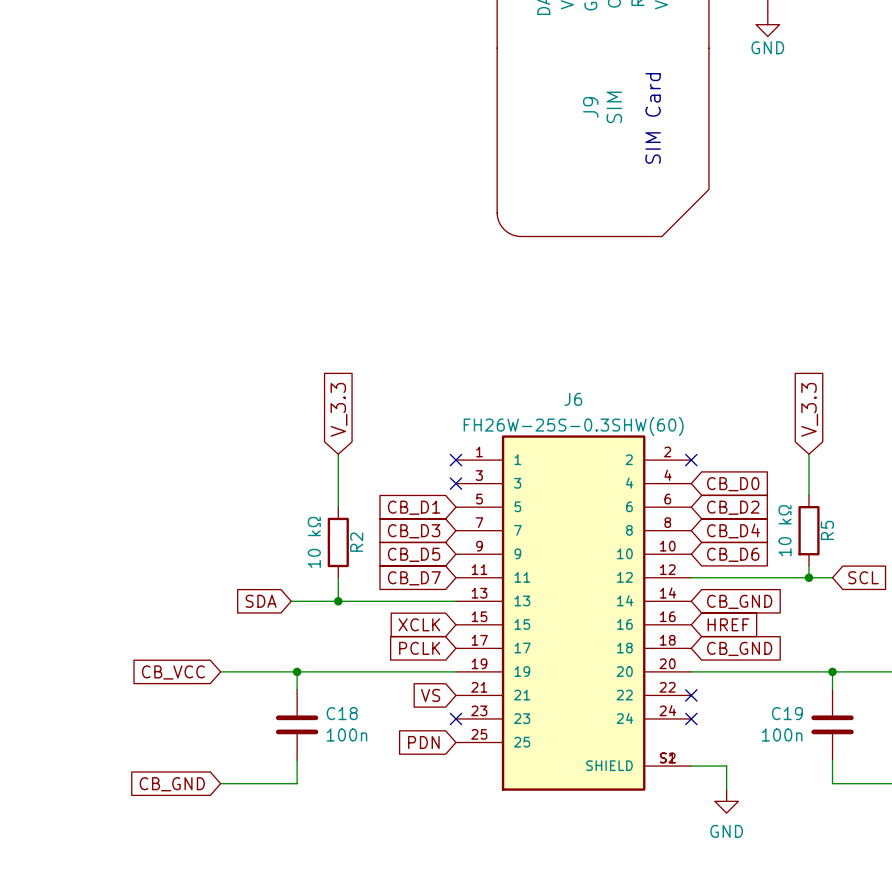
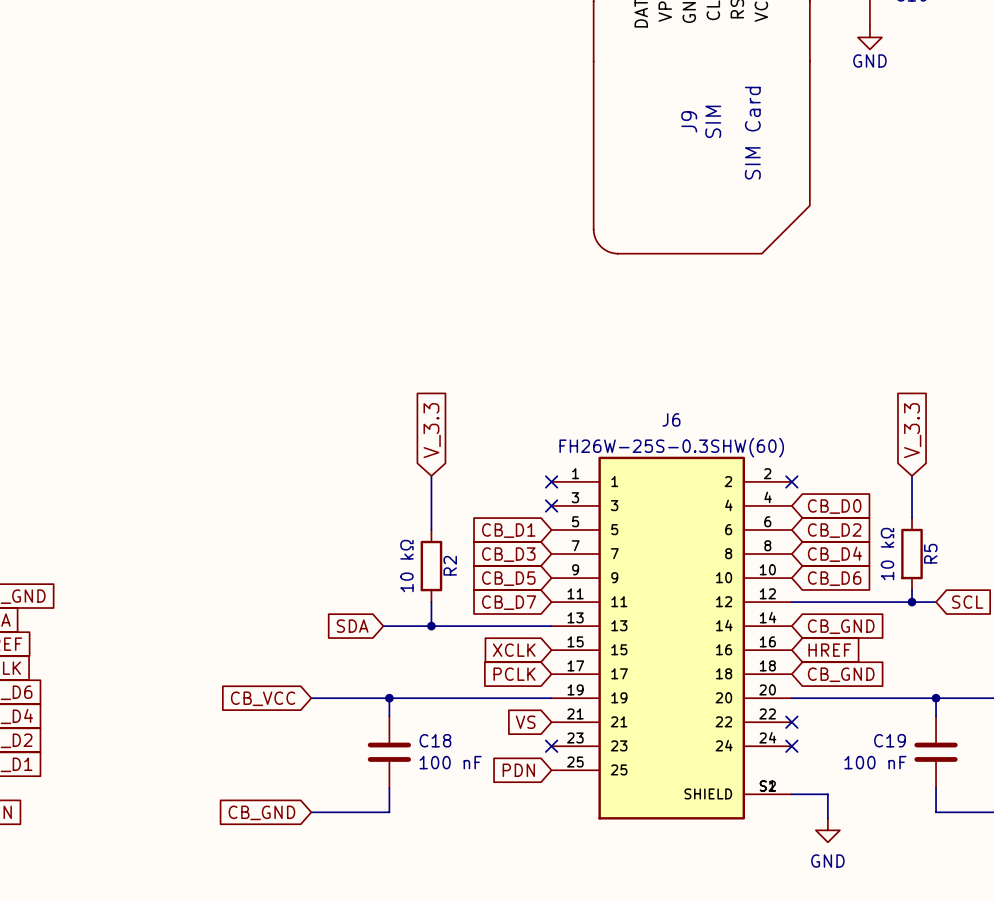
C18 value: 100n (346, 735) -> 100 nF (450, 762)
C19 value: 100n (782, 735) -> 100 nF (875, 762)

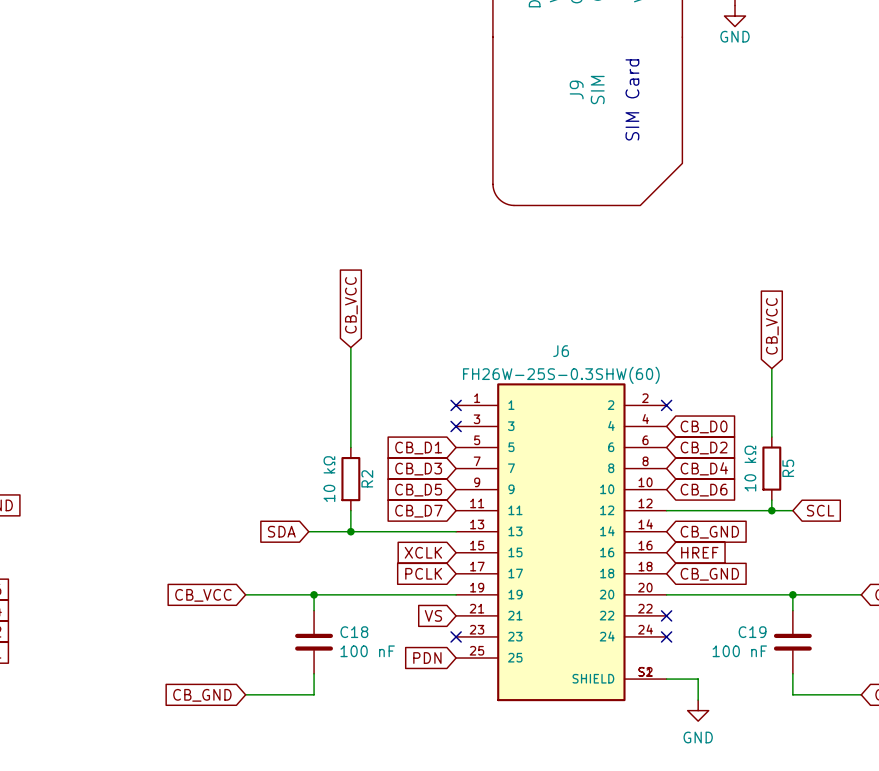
global label: none -> CB_VCC (351, 305)
global label: none -> CB_VCC (772, 326)
wire: none -> (350, 347) (350, 400)
global label: V_3.3 (432, 430) -> none
global label: V_3.3 (912, 430) -> none
wire: none -> (771, 368) (771, 400)

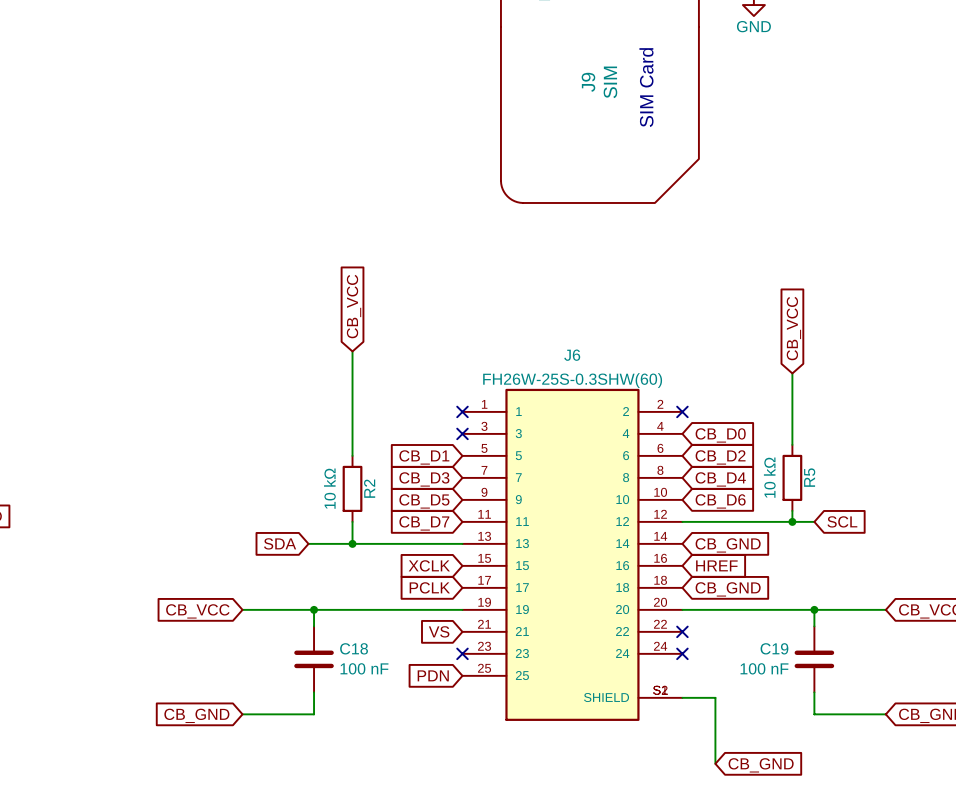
wire: none -> (715, 719) (715, 763)
power symbol: GND (698, 710) -> none
global label: none -> CB_GND (761, 765)

